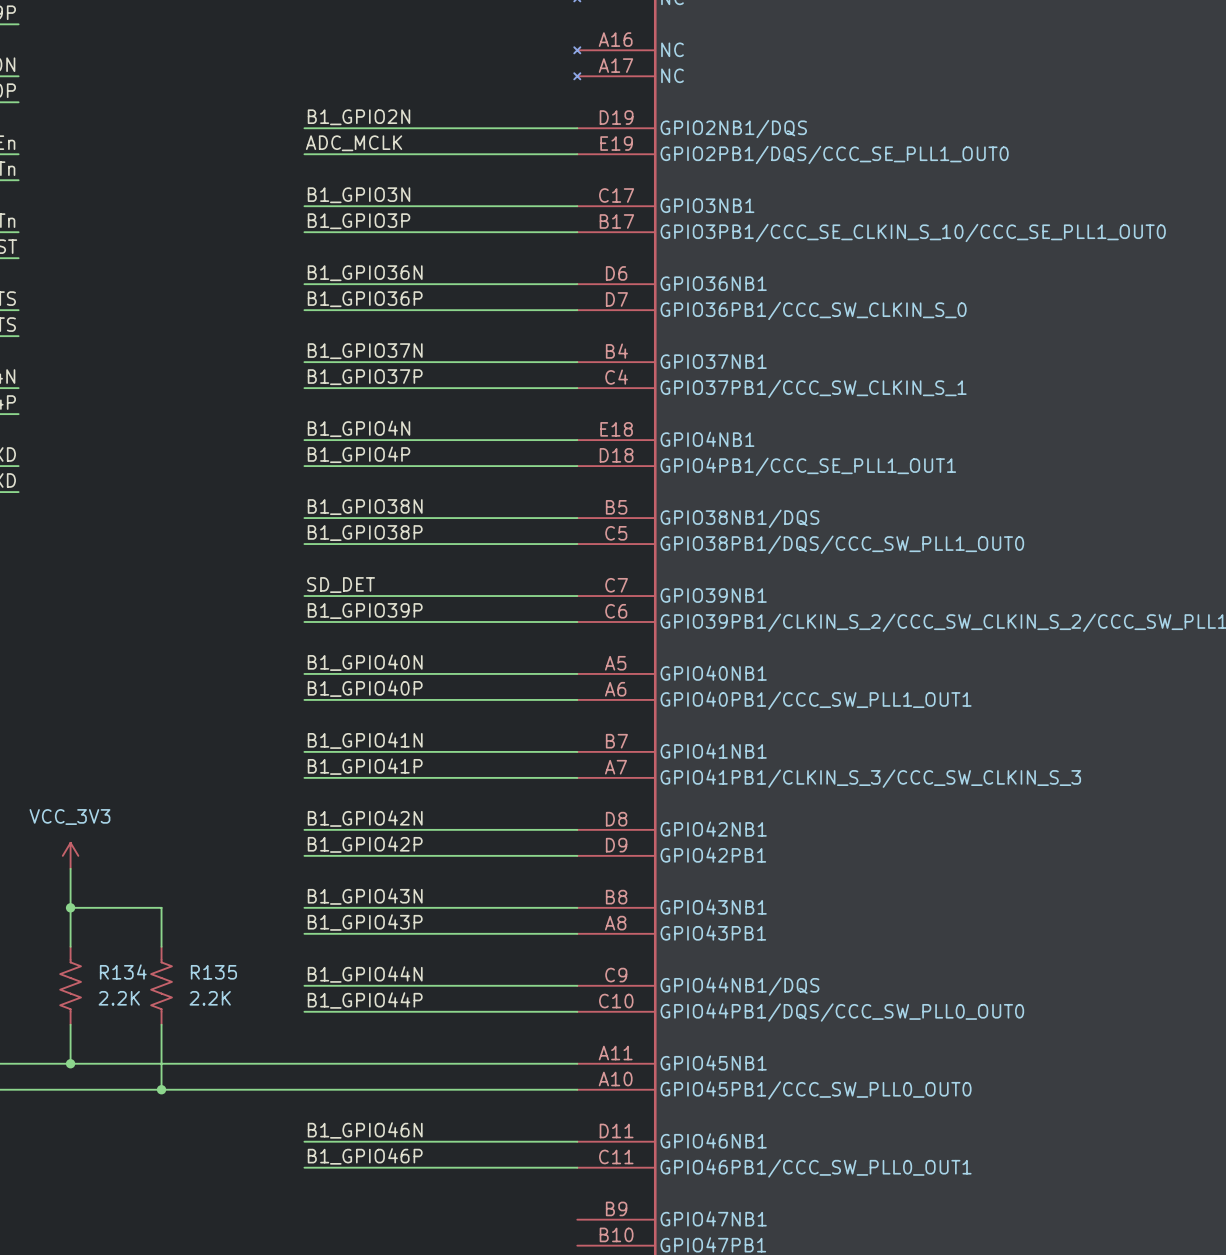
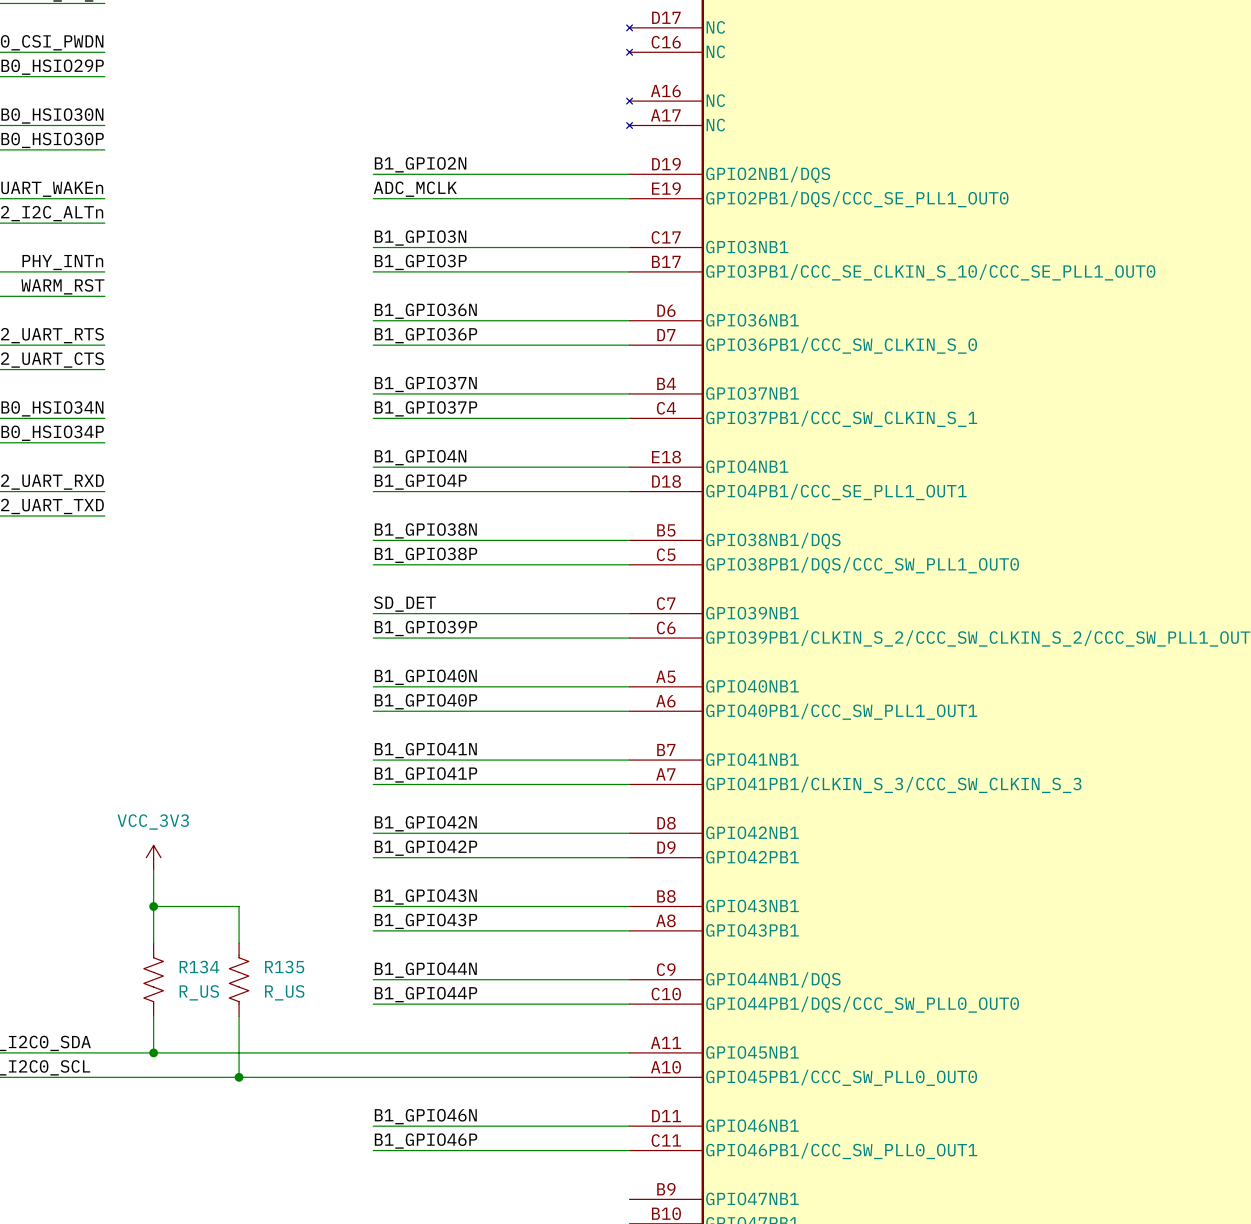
R134 value: 2.2K (119, 998) -> R_US (199, 992)
R135 value: 2.2K (210, 998) -> R_US (284, 992)

